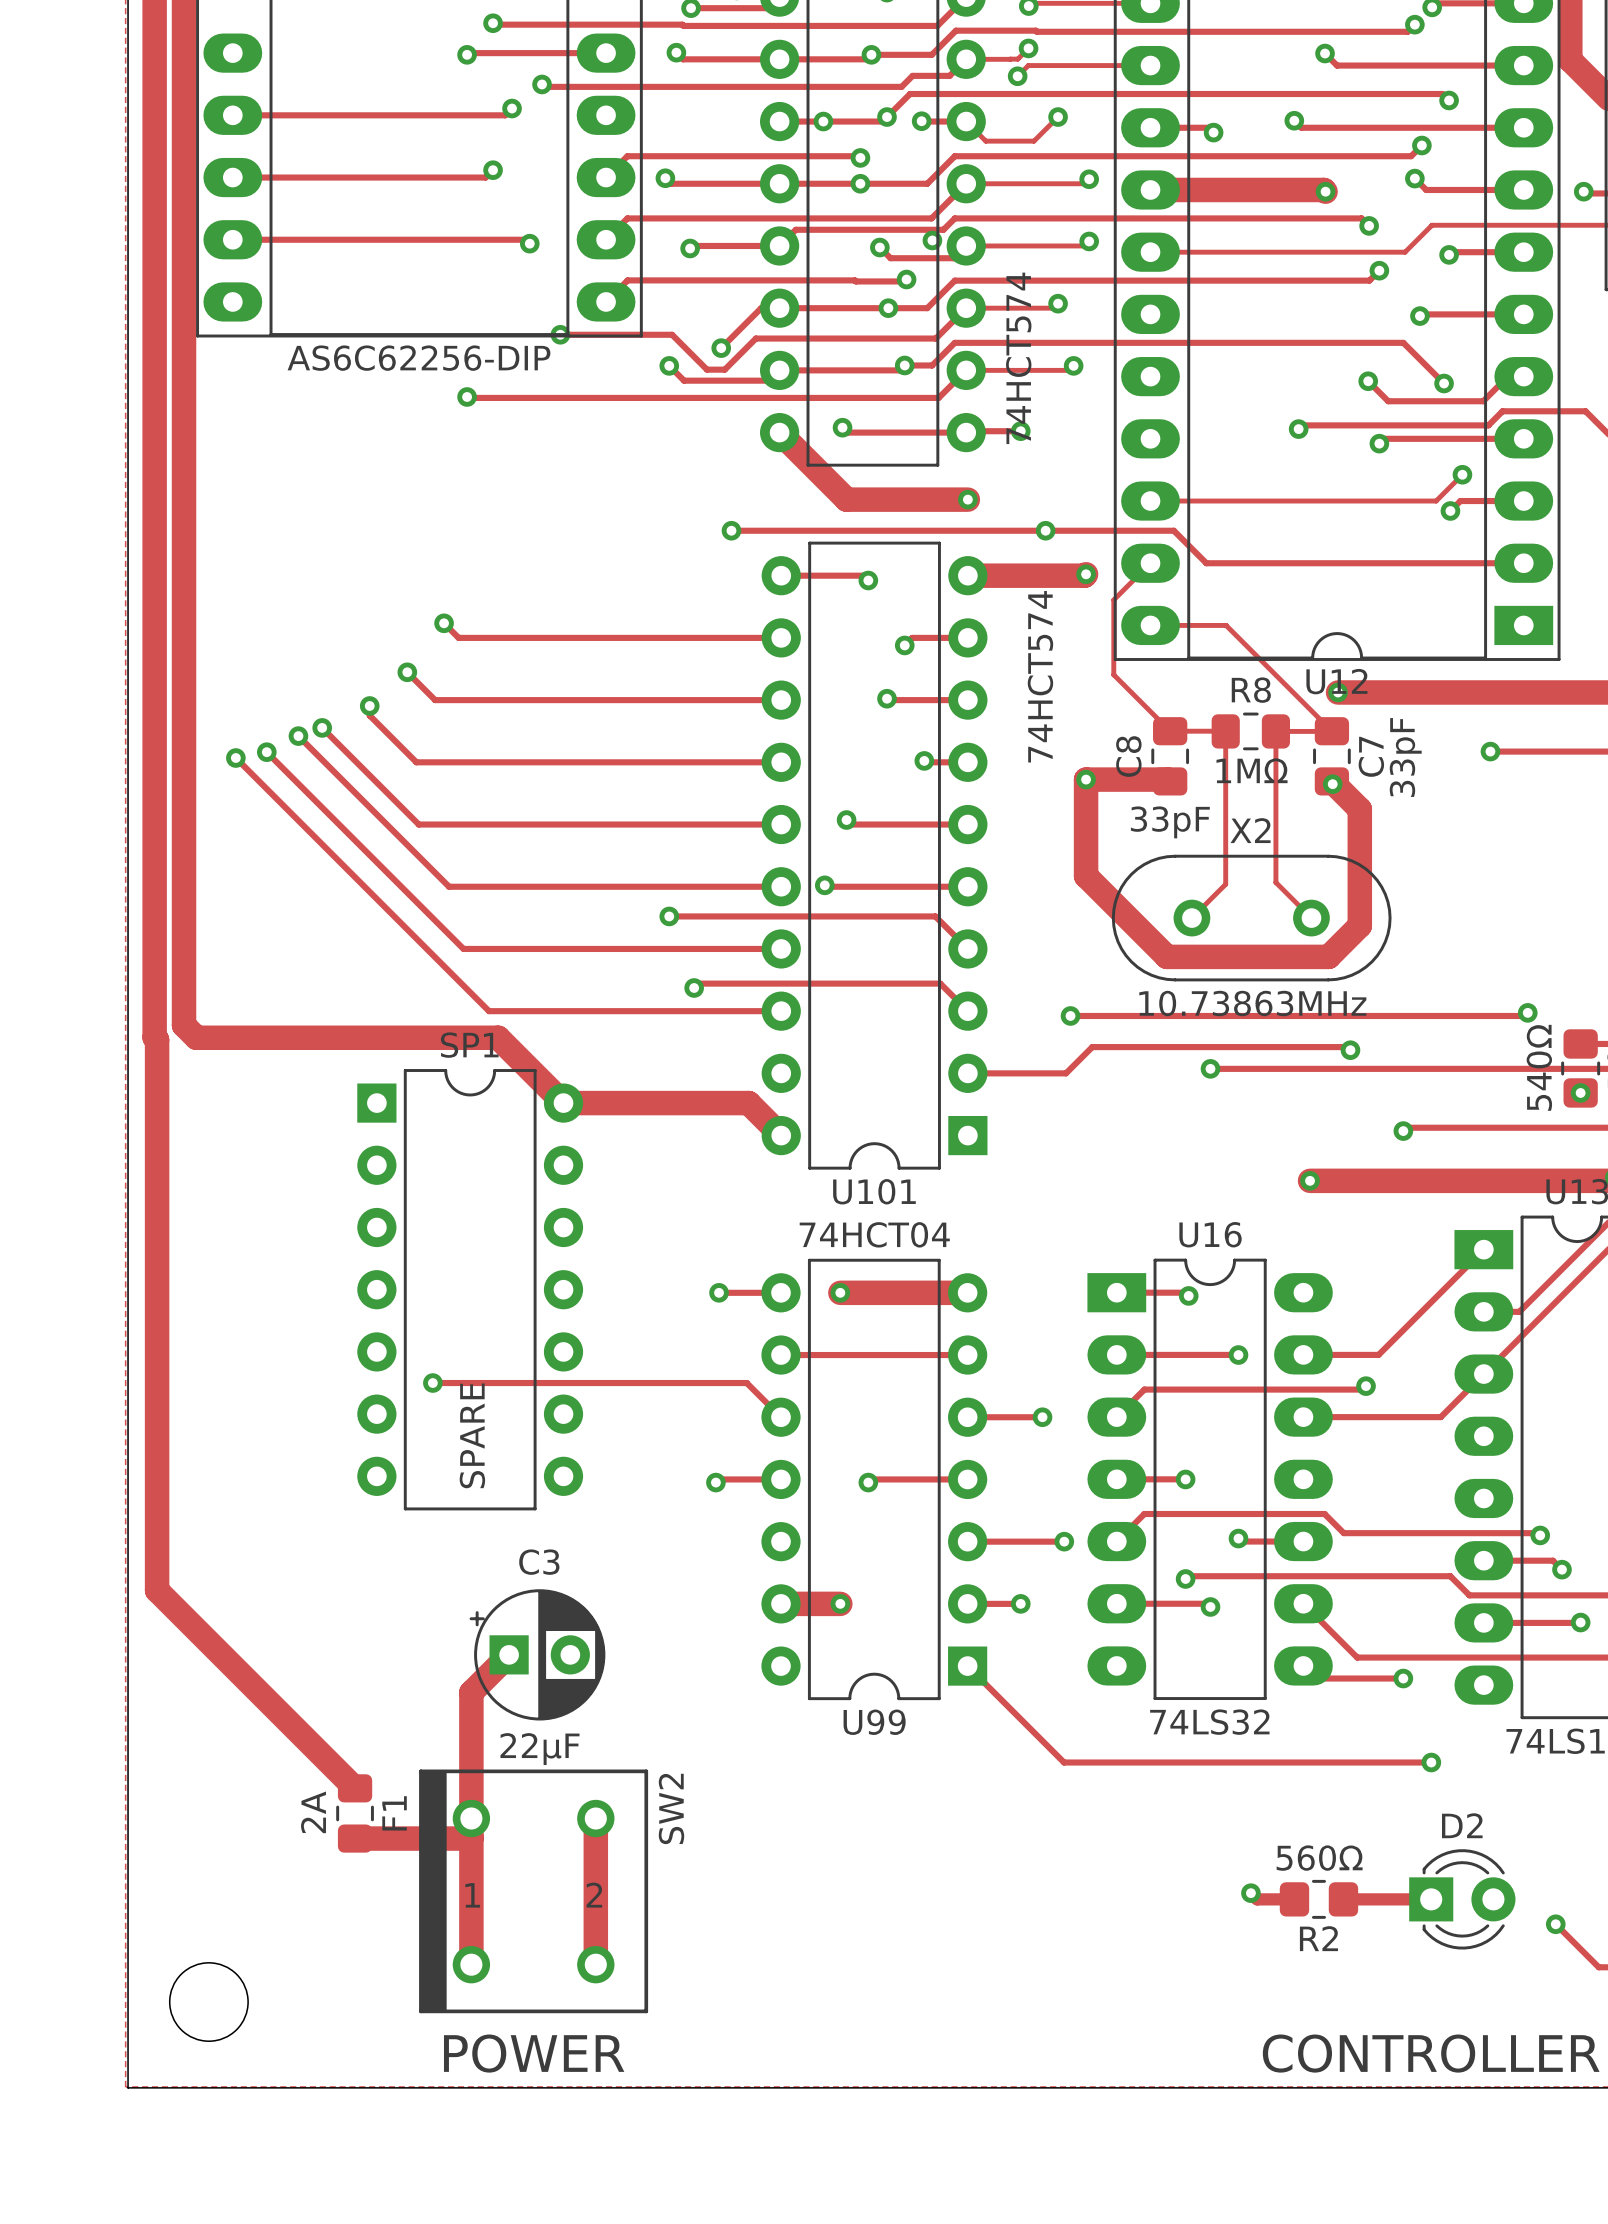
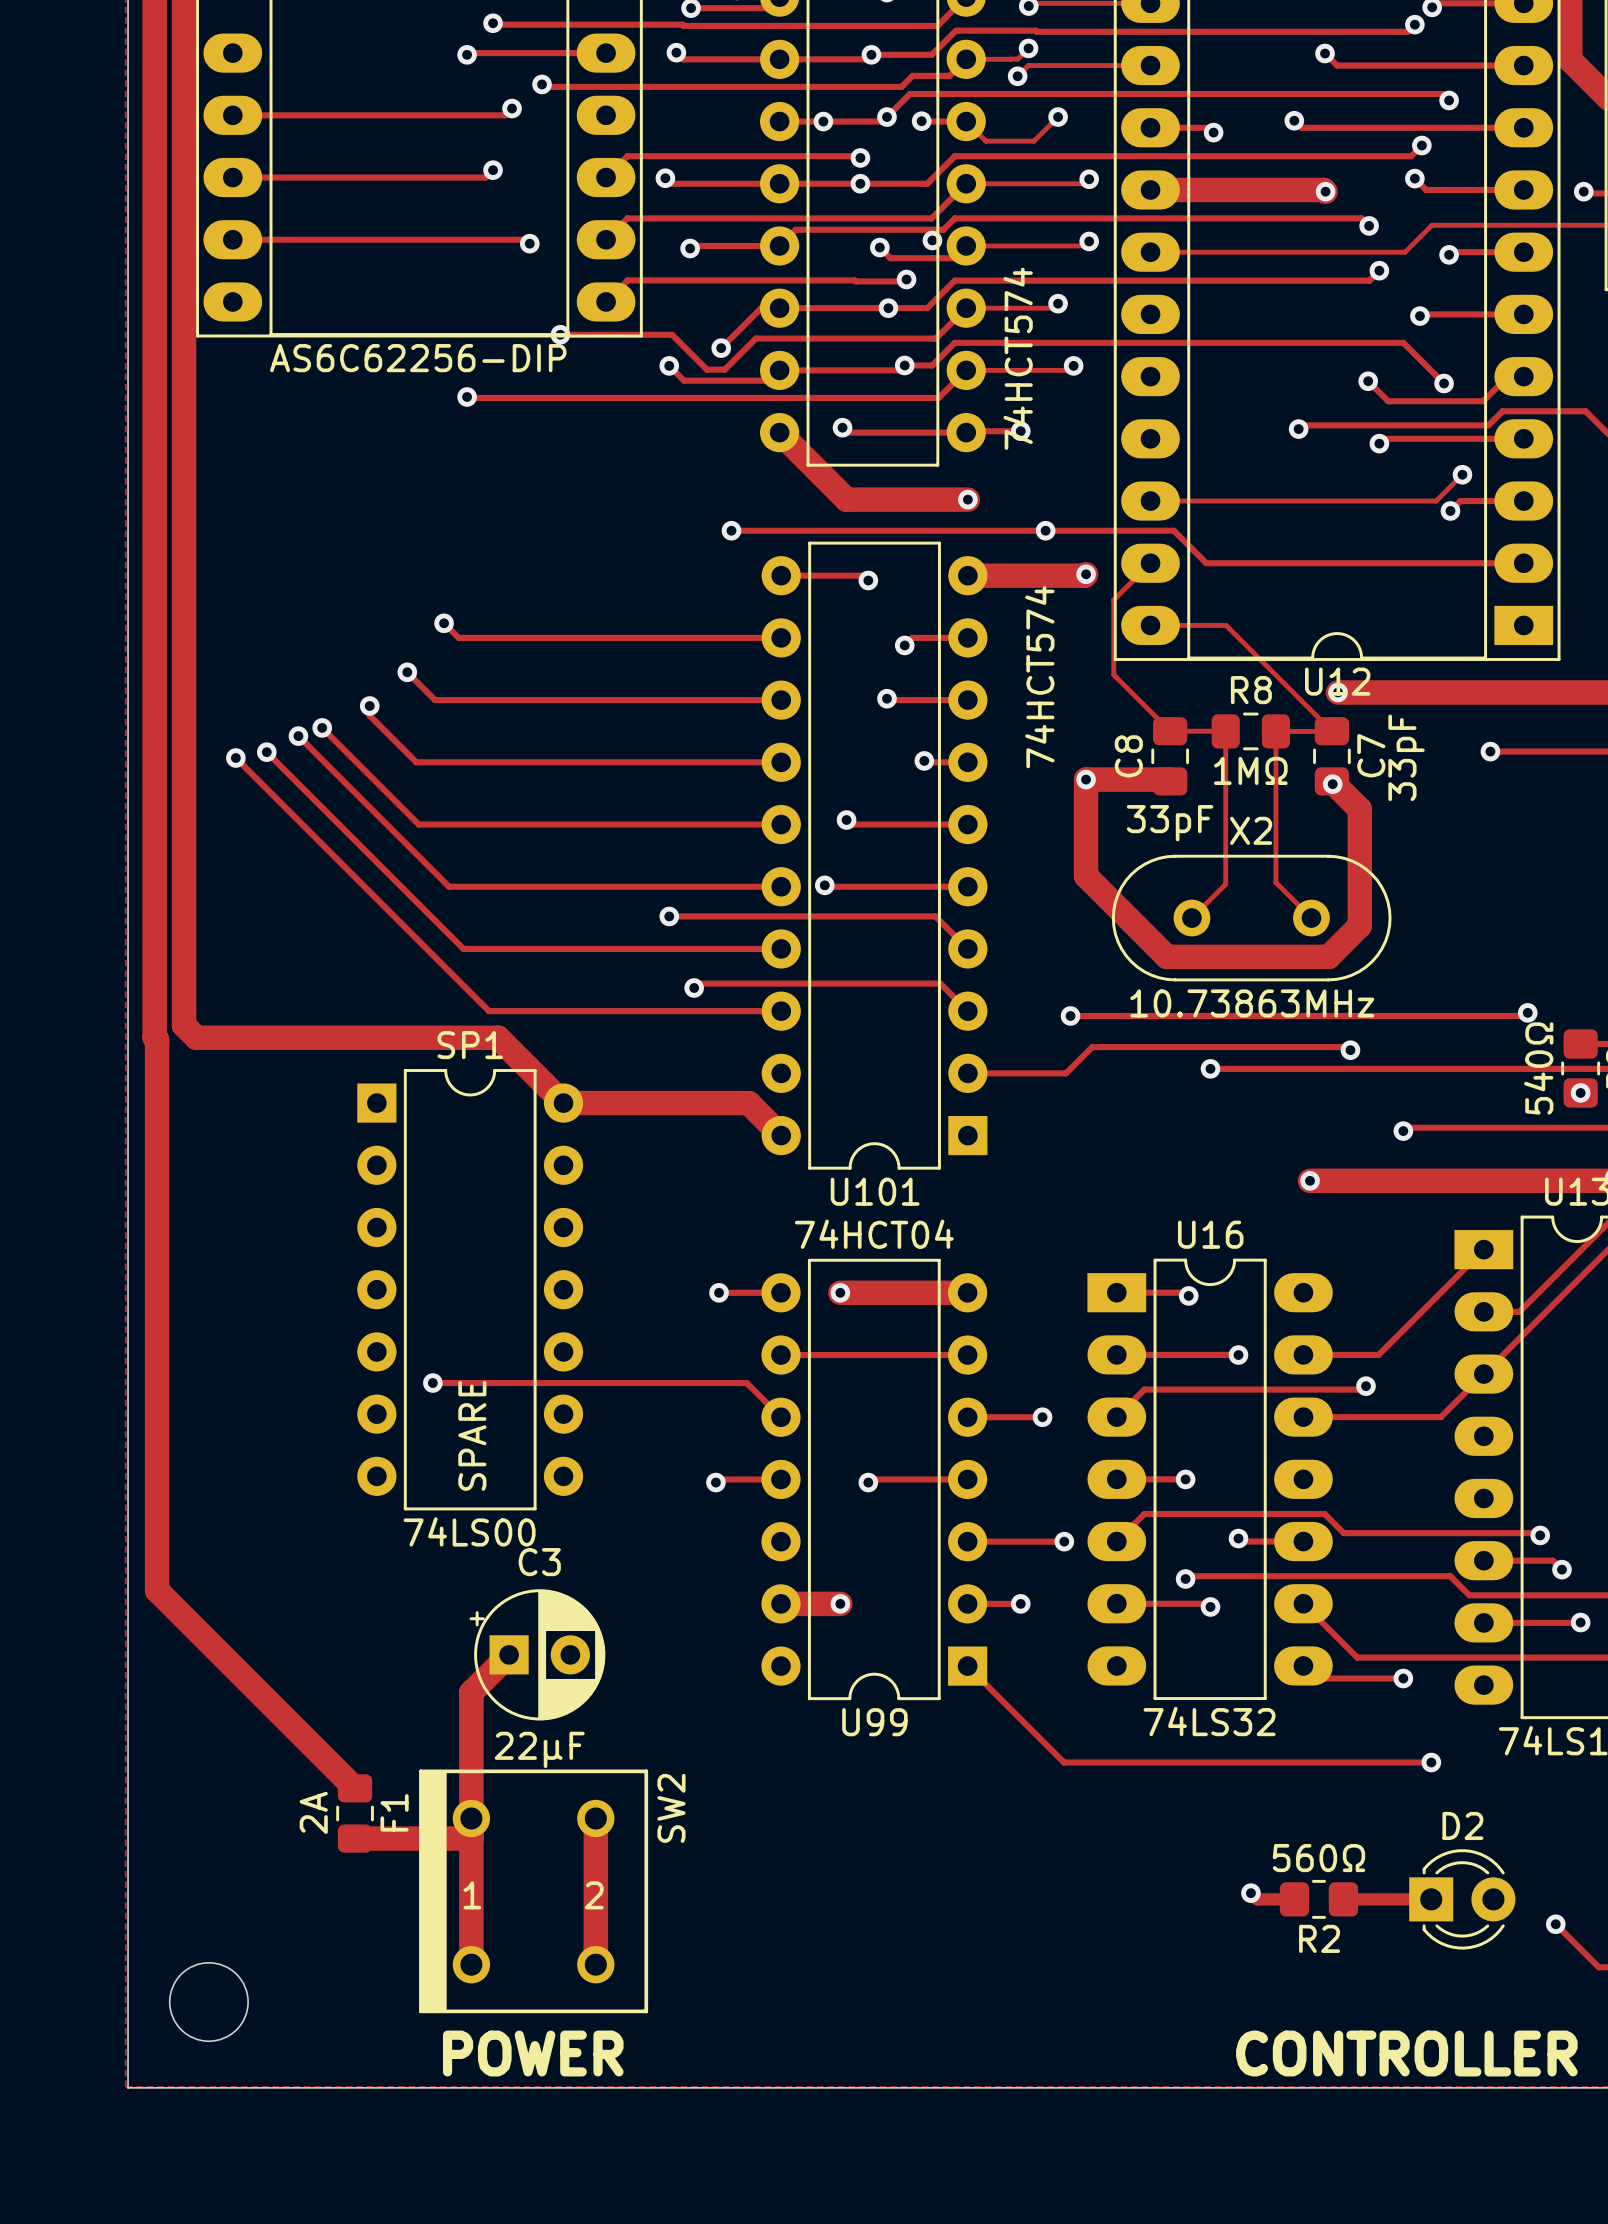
SP1 value: none -> 74LS00 (469, 1531)

